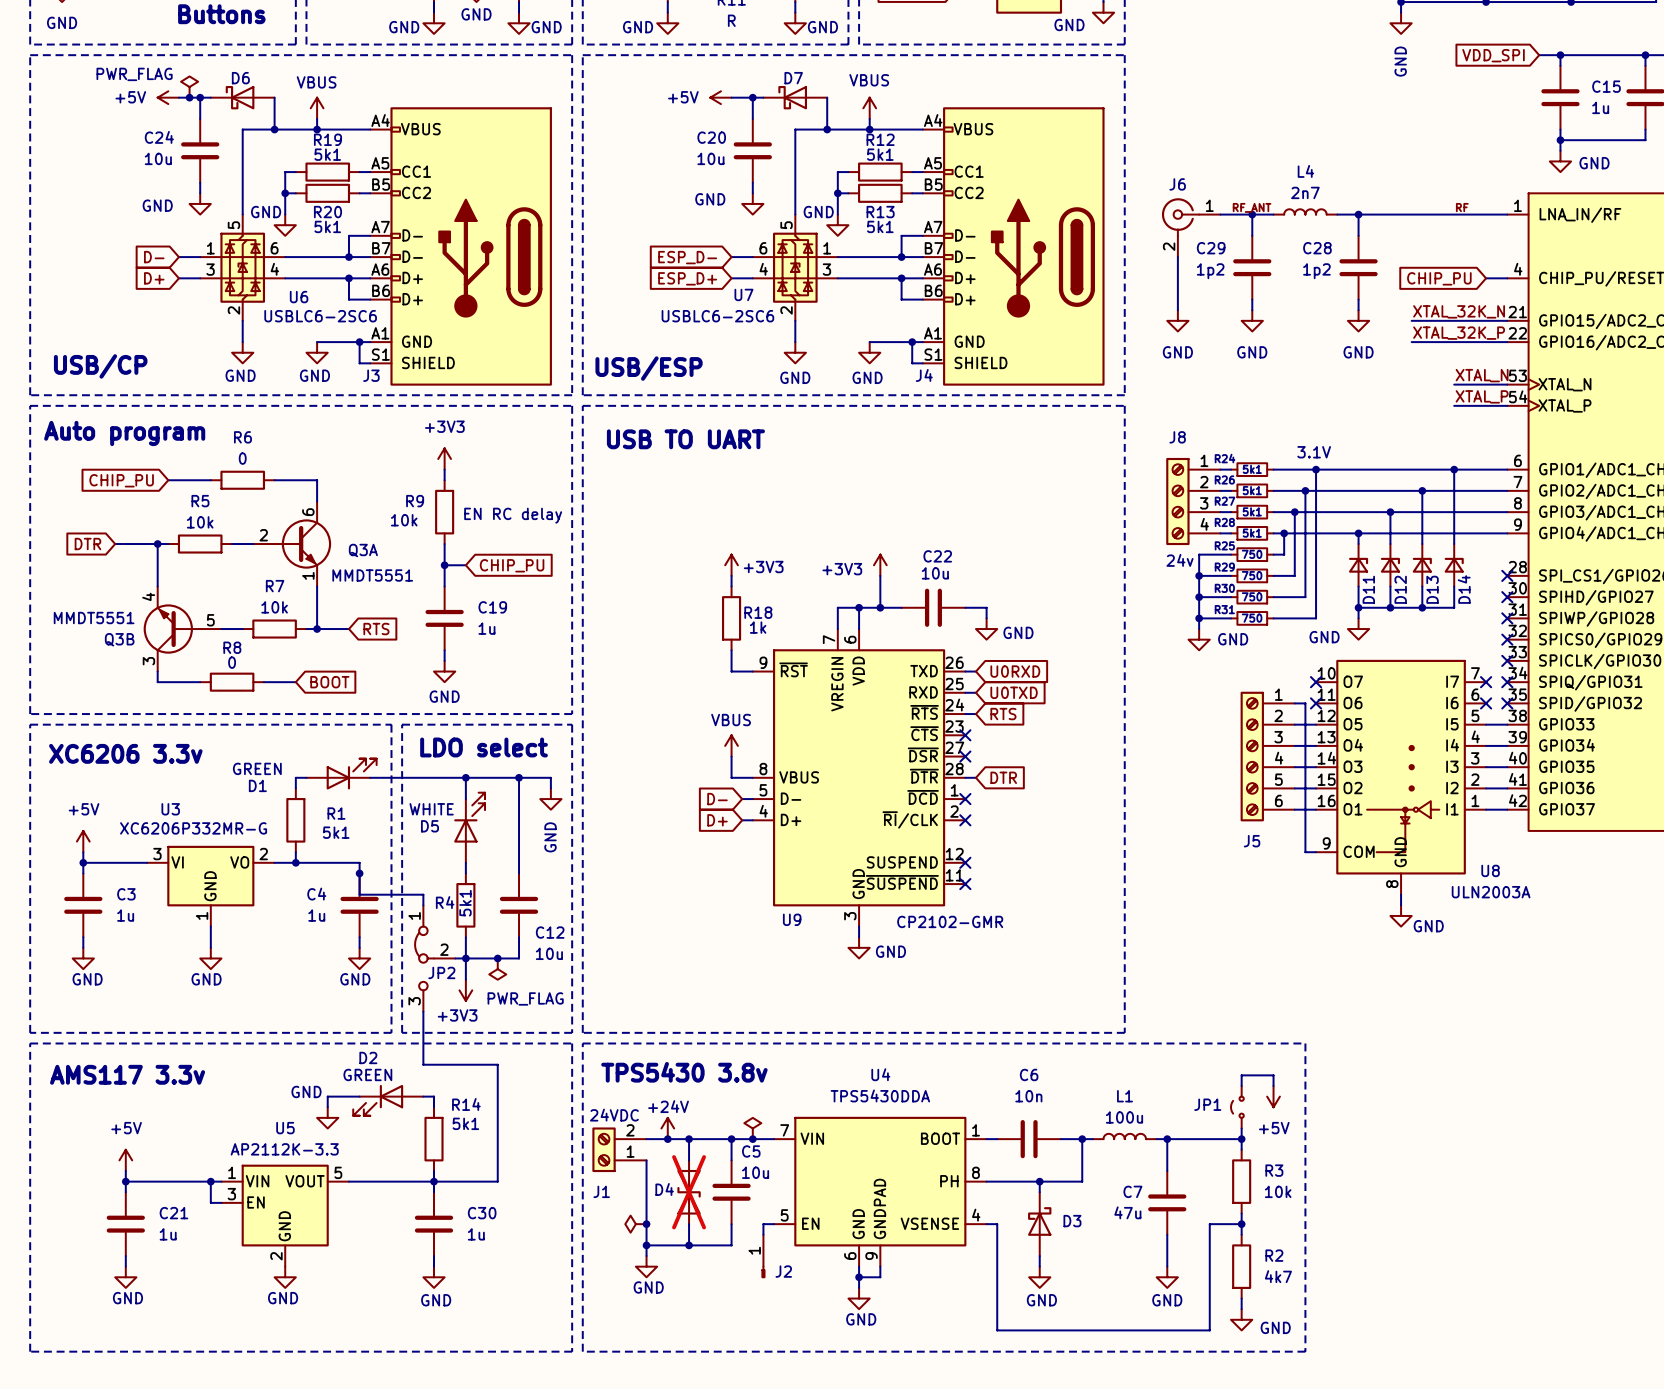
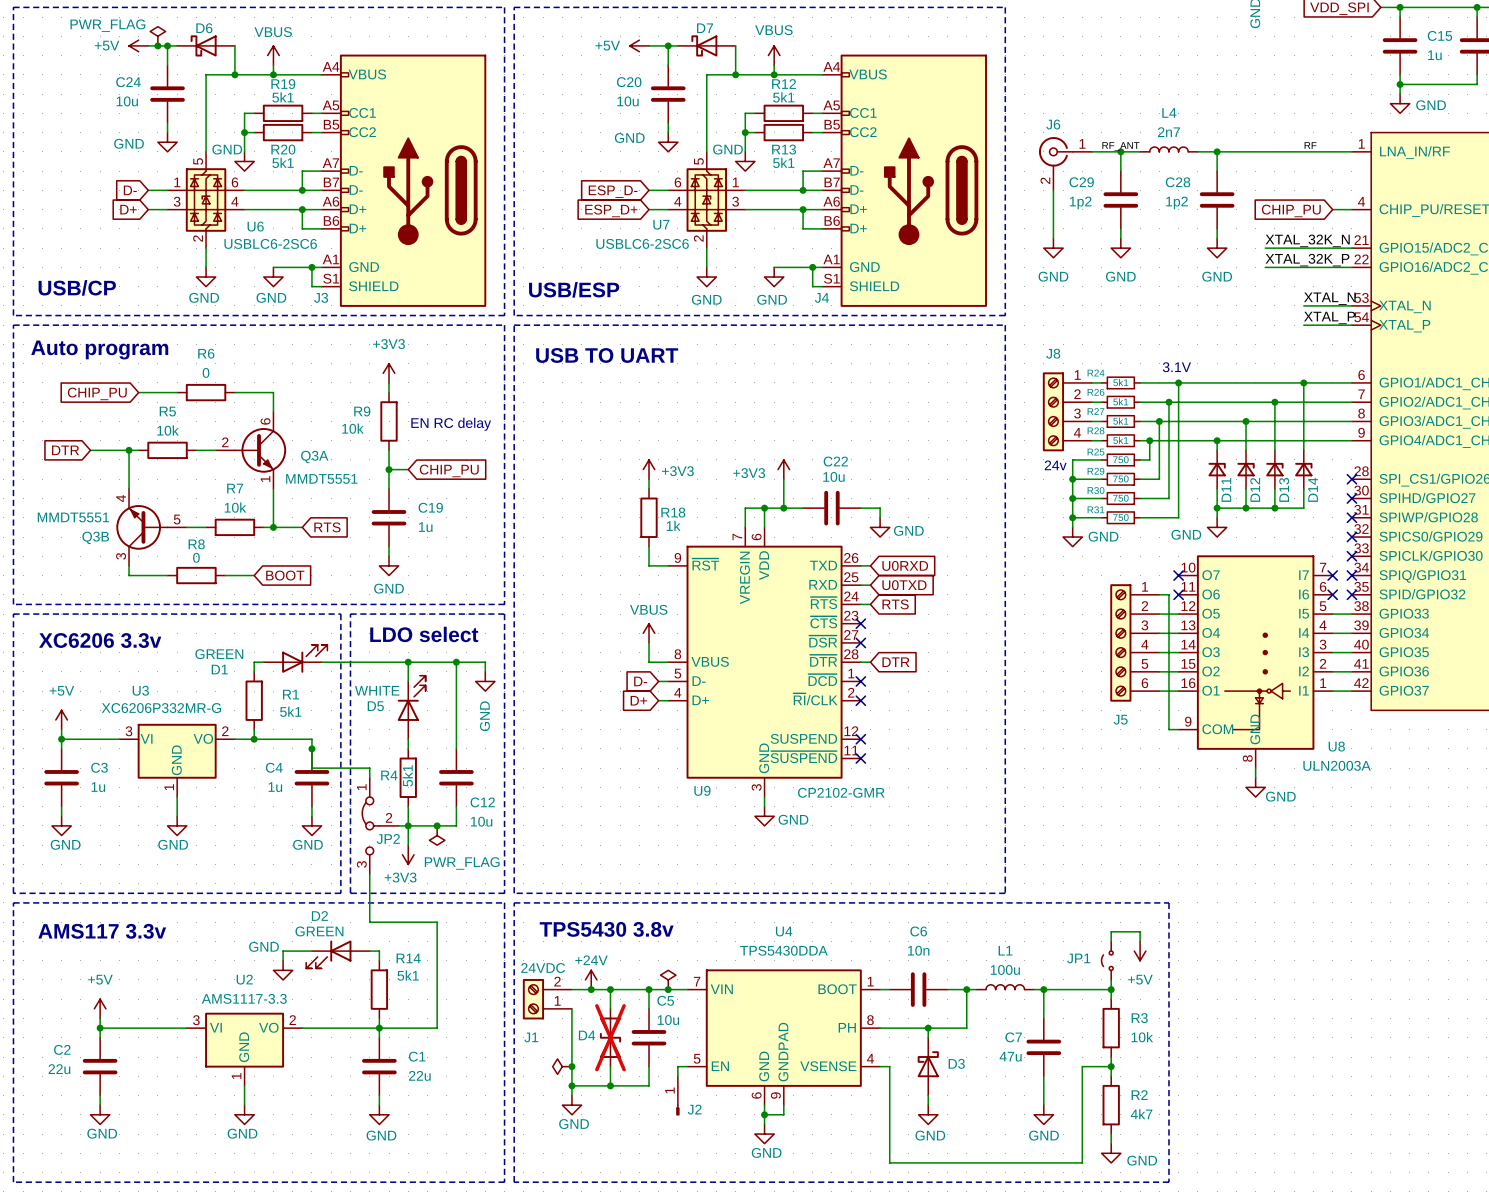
wire: (210, 1181) (210, 1202) (221, 1202) -> none
junction: (210, 1181) -> none
U2: none -> AMS1117-3.3 (244, 1049)
C21 name: C21 (173, 1213) -> C2 (62, 1049)
C30 name: C30 (482, 1213) -> C1 (417, 1056)
U5: AP2112K-3.3 (285, 1215) -> none
C21 value: 1u (168, 1234) -> 22u (59, 1069)
C30 value: 1u (476, 1234) -> 22u (419, 1075)

